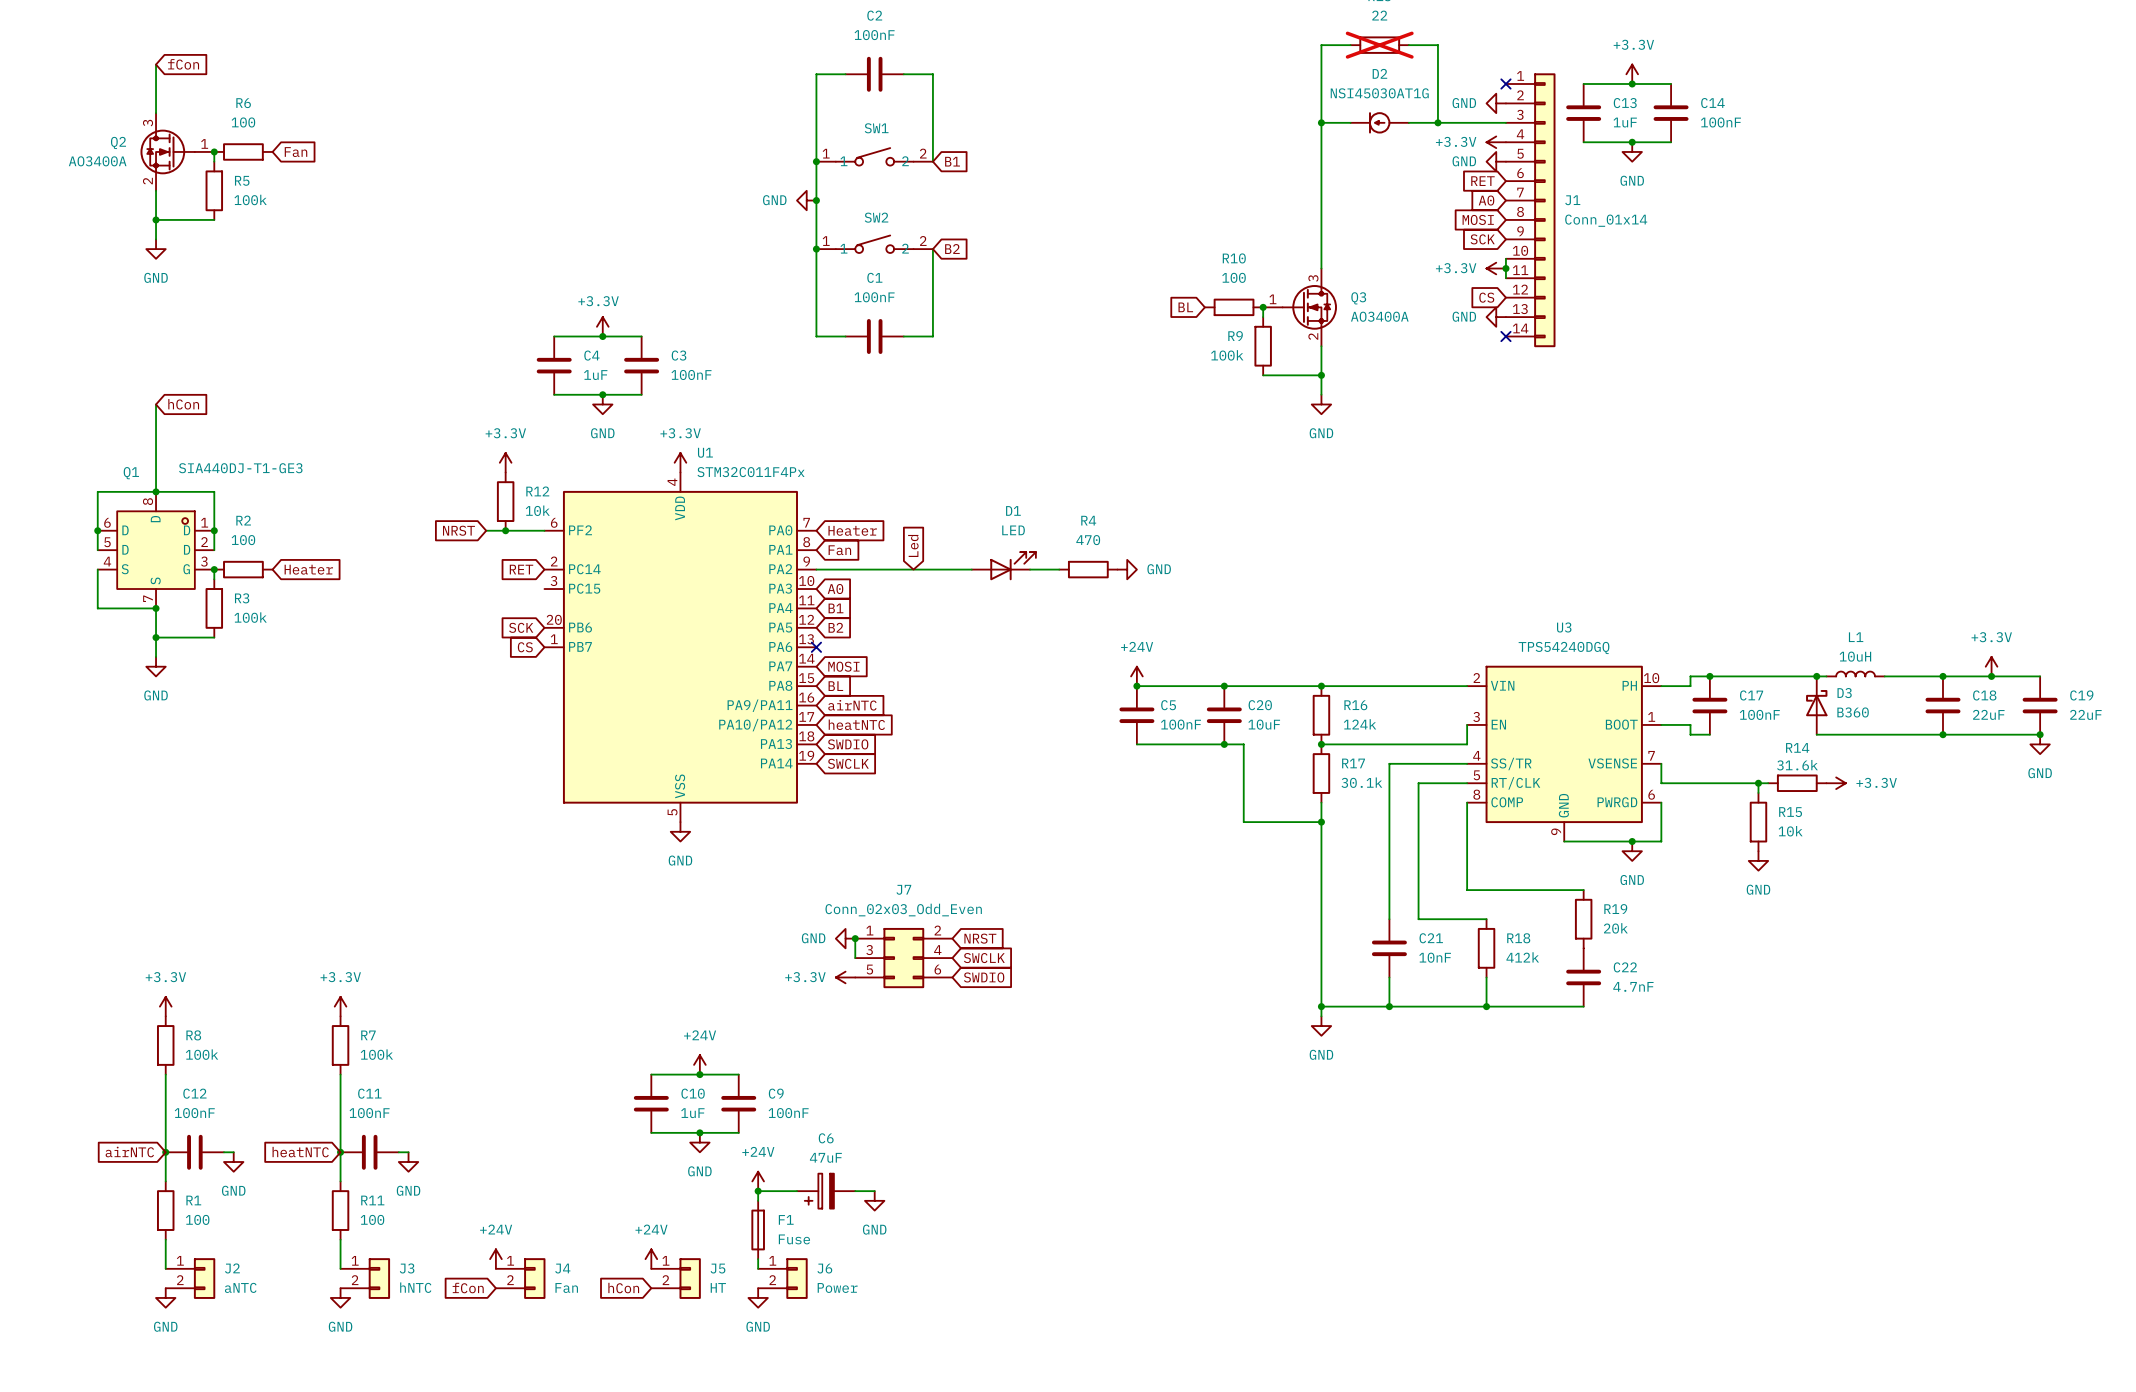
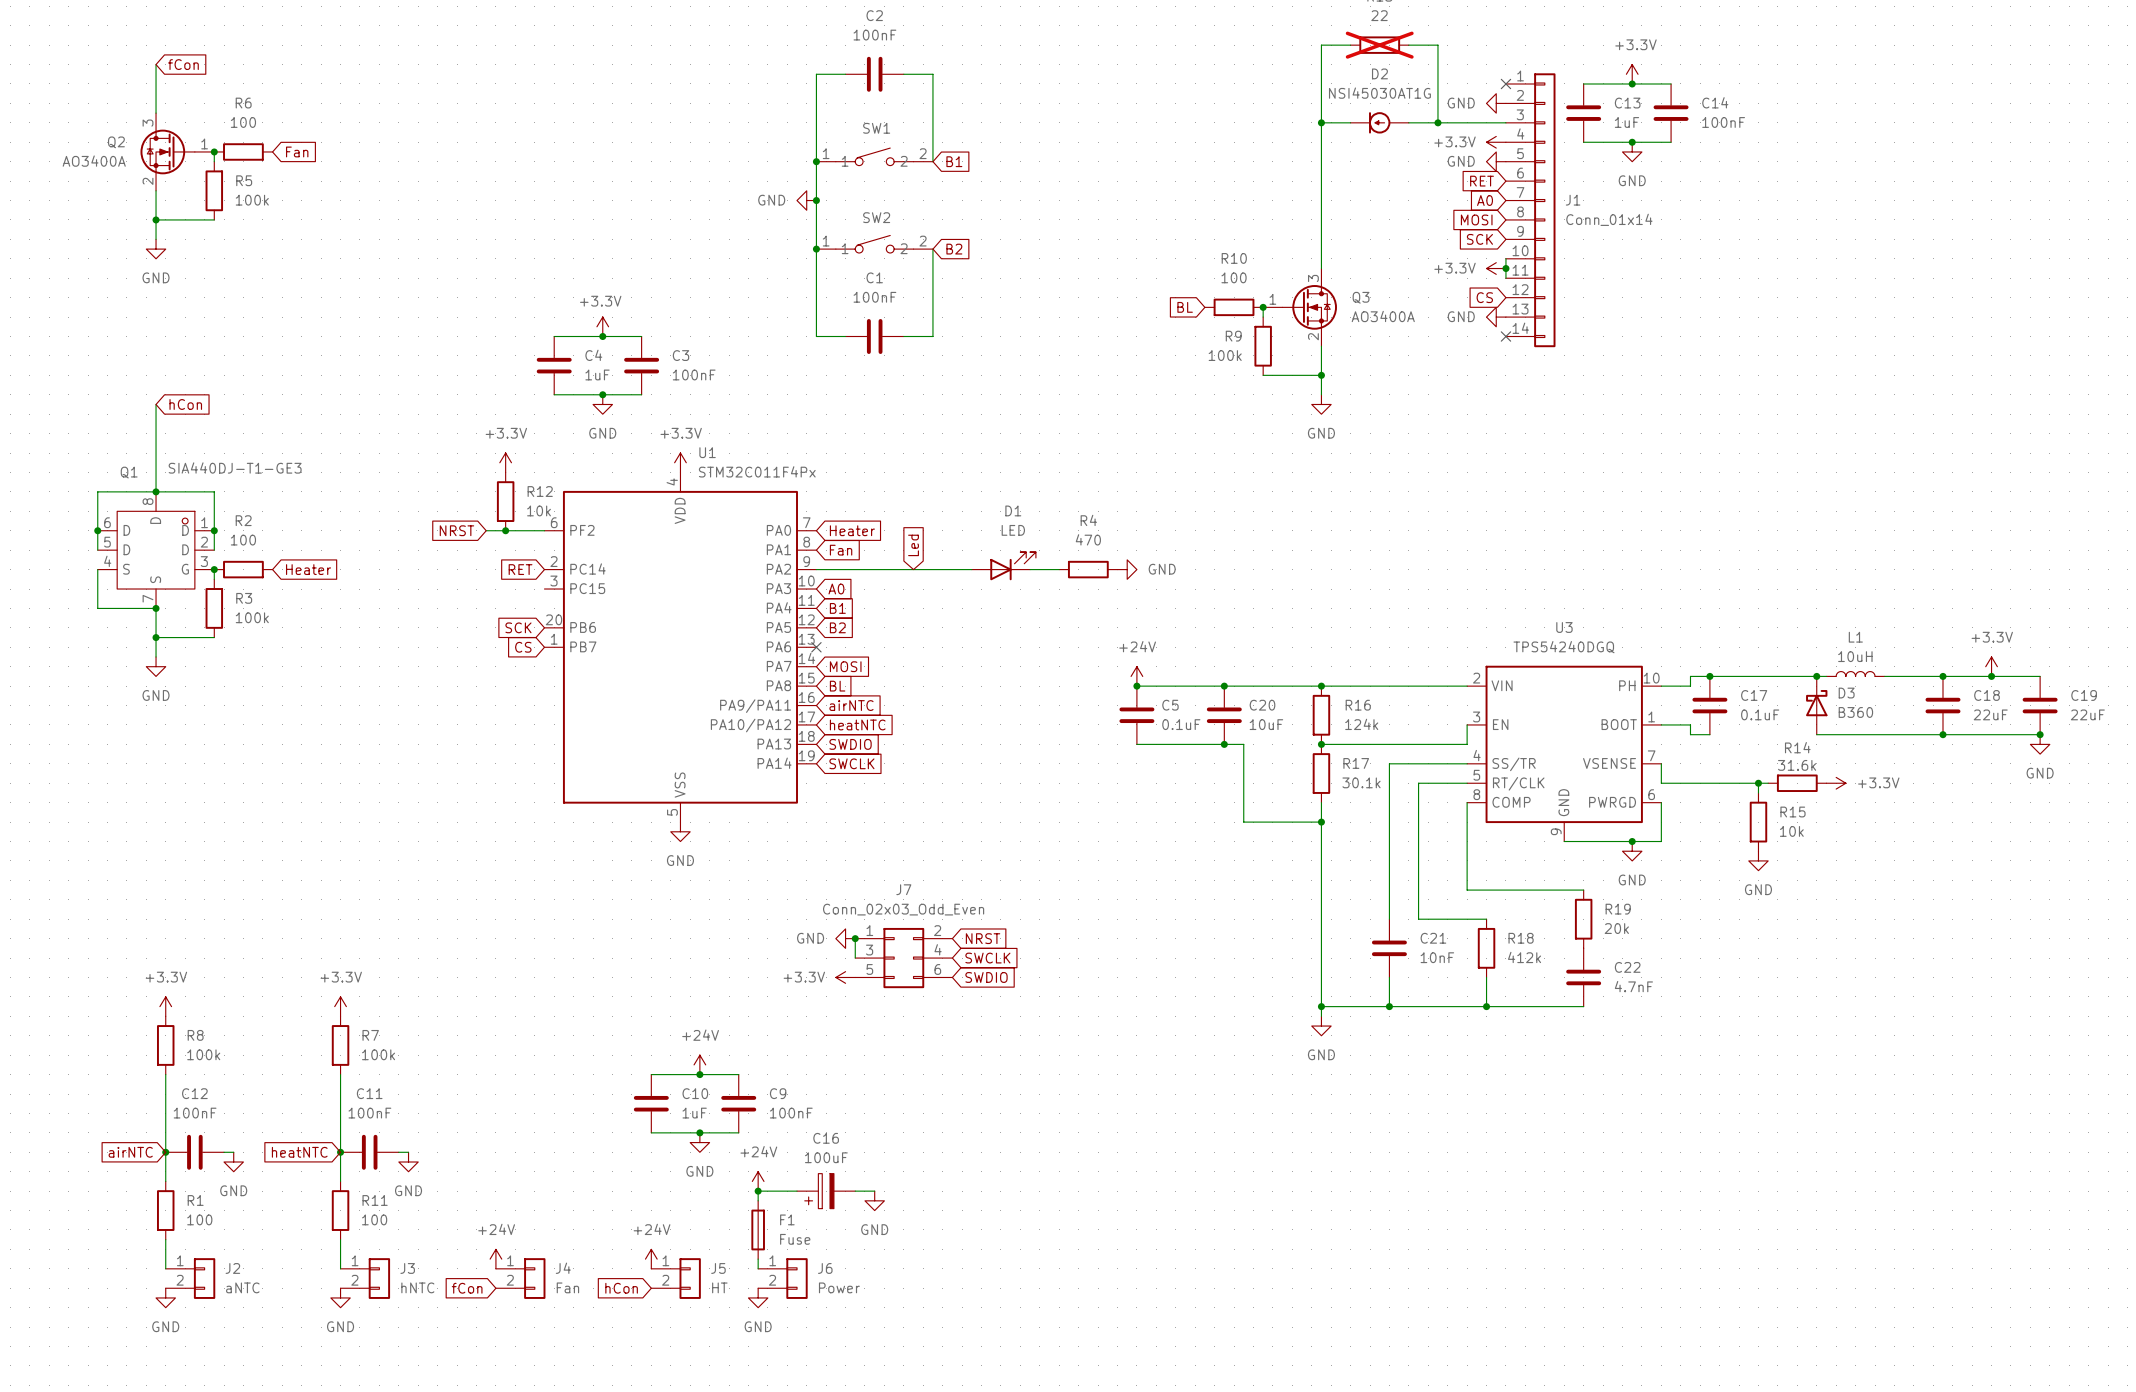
C17 value: 100nF (1759, 714) -> 0.1uF (1760, 714)
C5 value: 100nF (1180, 724) -> 0.1uF (1181, 724)
C6 name: C6 (826, 1138) -> C16 (826, 1138)
C6 value: 47uF (825, 1157) -> 100uF (826, 1157)

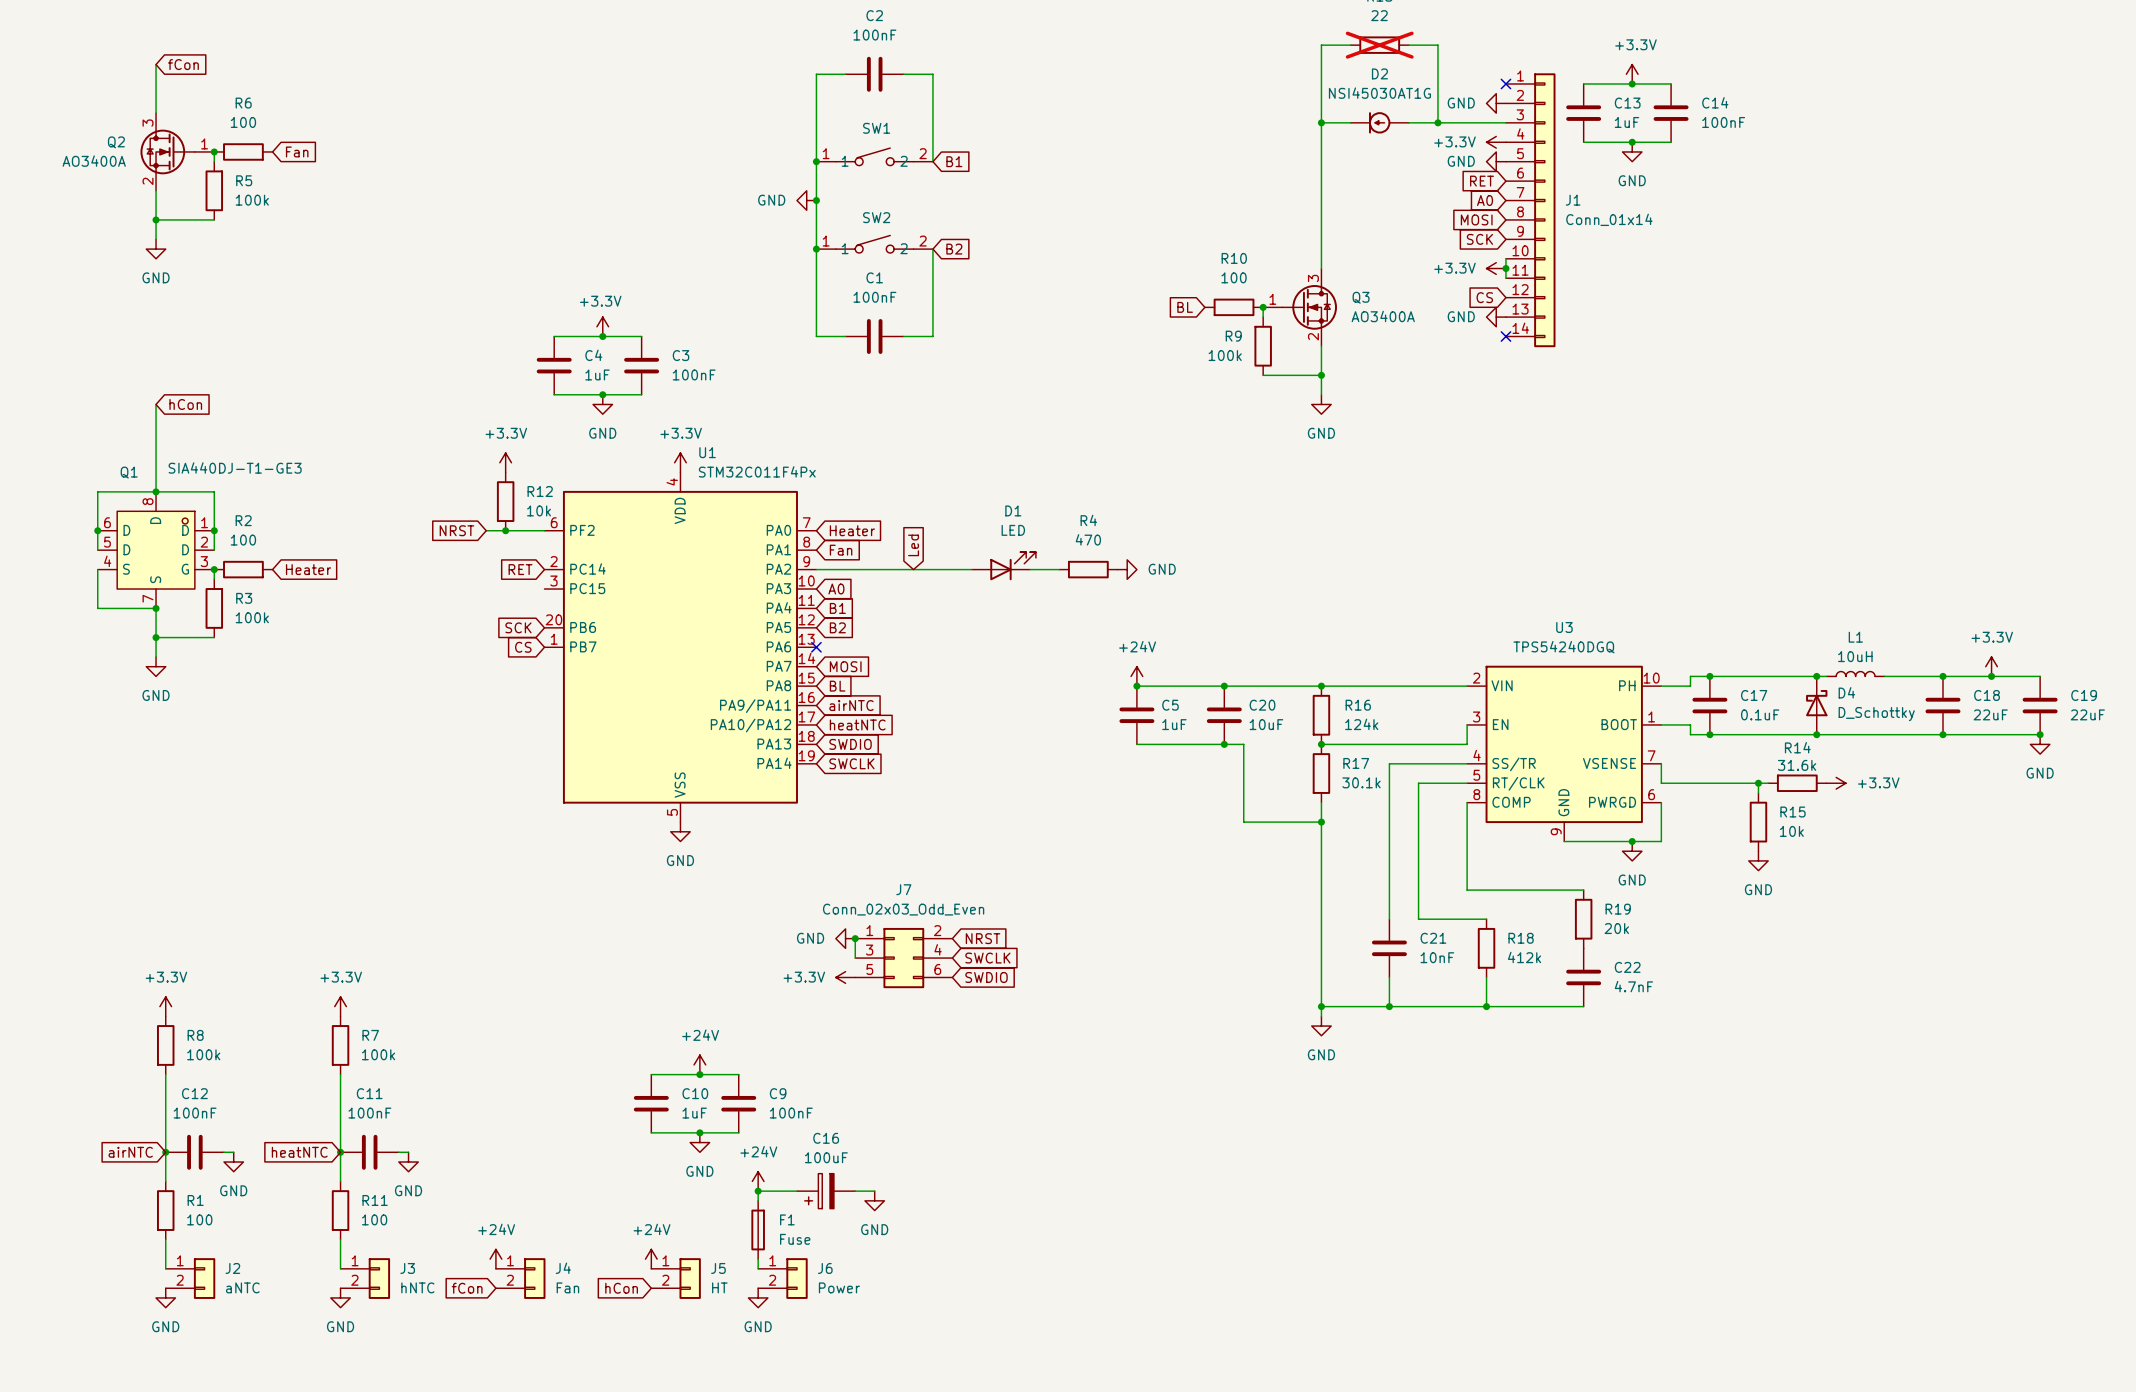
D3 name: D3 (1846, 693) -> D4 (1846, 692)
D3 value: B360 (1855, 712) -> D_Schottky (1876, 714)
C5 value: 0.1uF (1181, 724) -> 1uF (1174, 724)
wire: none -> (1709, 734) (1816, 734)
junction: none -> (1709, 734)
junction: none -> (1816, 734)

